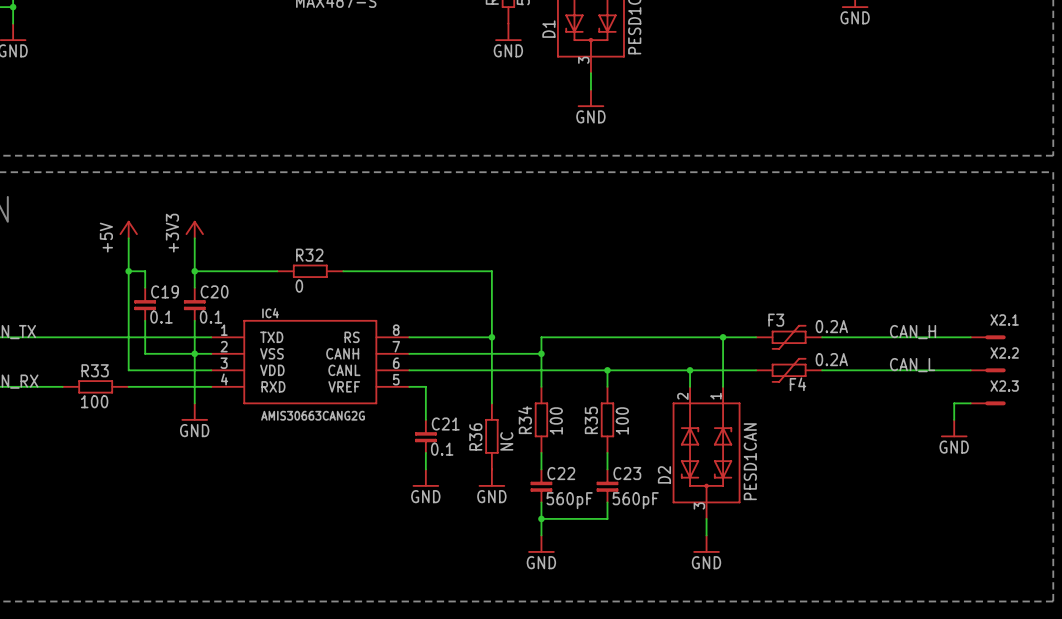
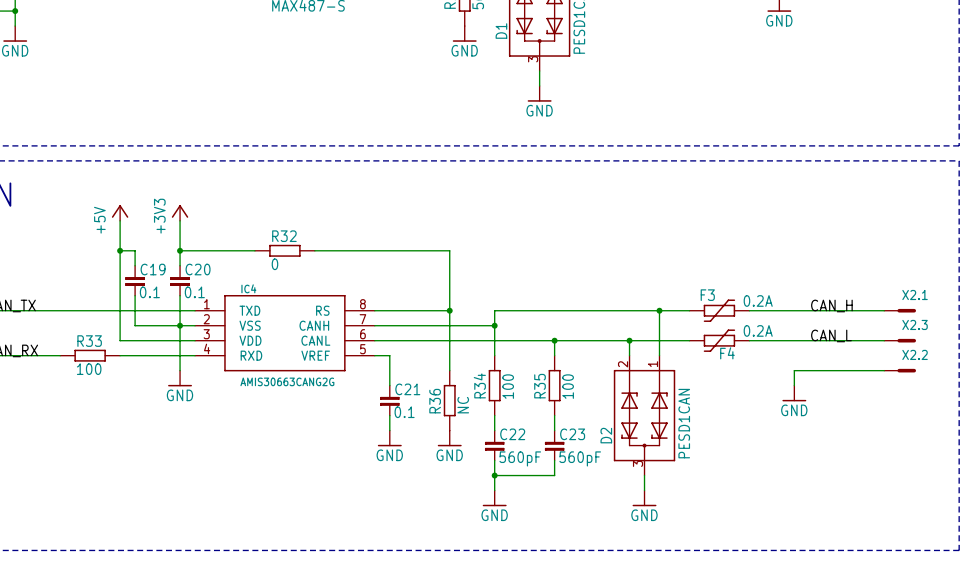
X2.2 name: X2.2 (1004, 353) -> X2.3 (915, 324)
X2.3 name: X2.3 (1004, 386) -> X2.2 (915, 354)
wire: (954, 403) (954, 419) -> (869, 370) (794, 370) (794, 385)
power symbol position: GND (954, 428) -> GND (794, 393)

